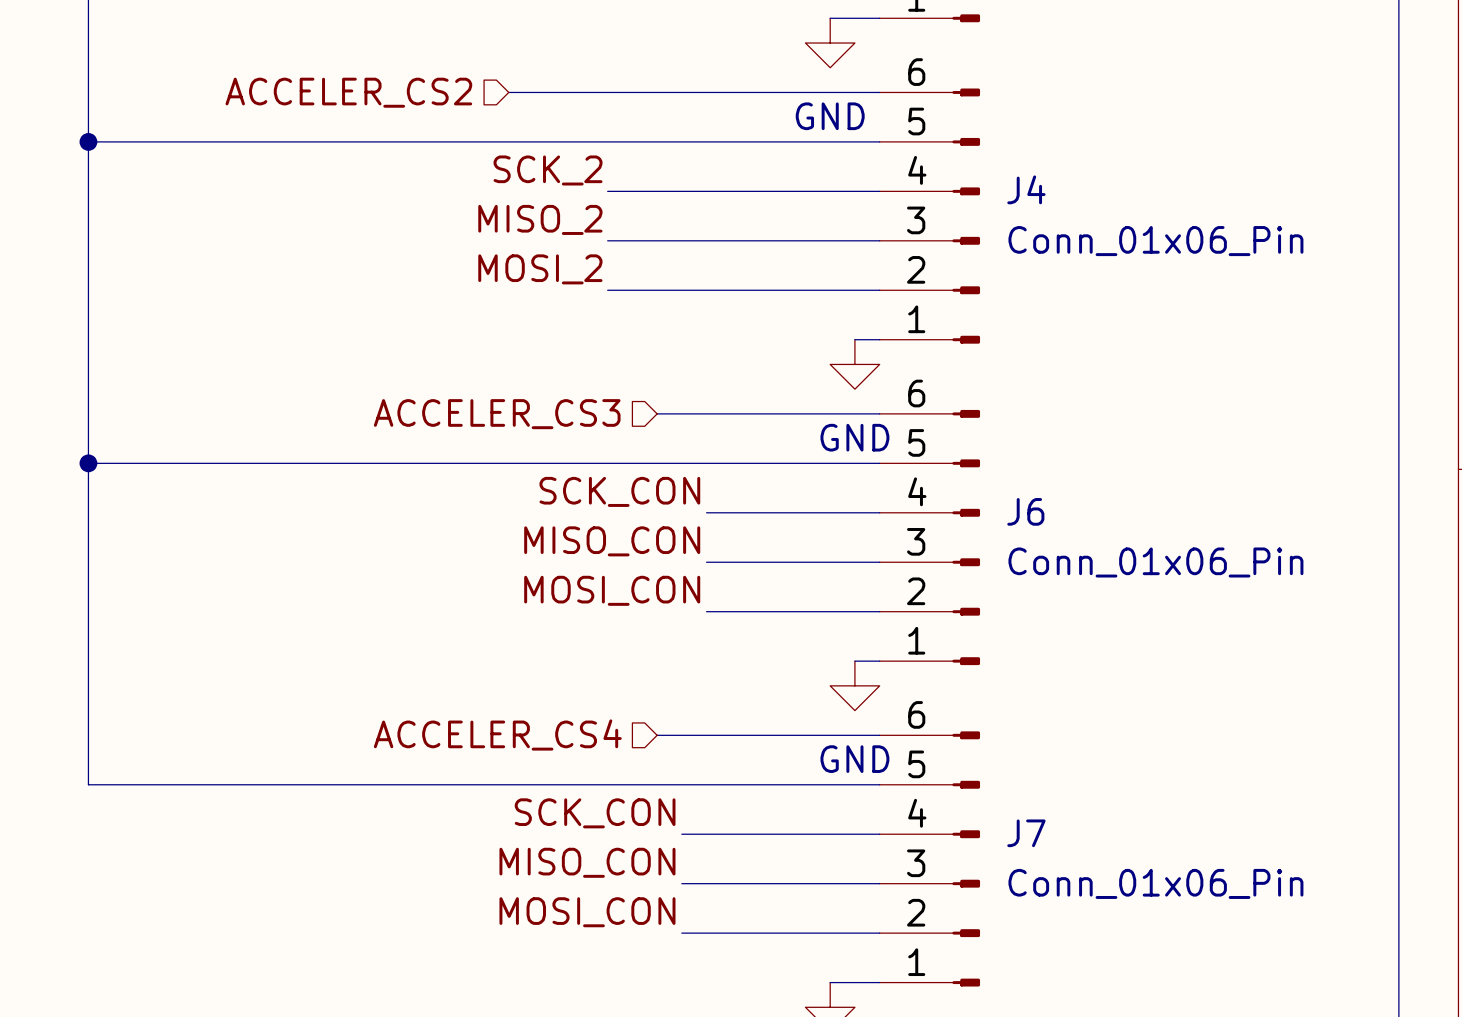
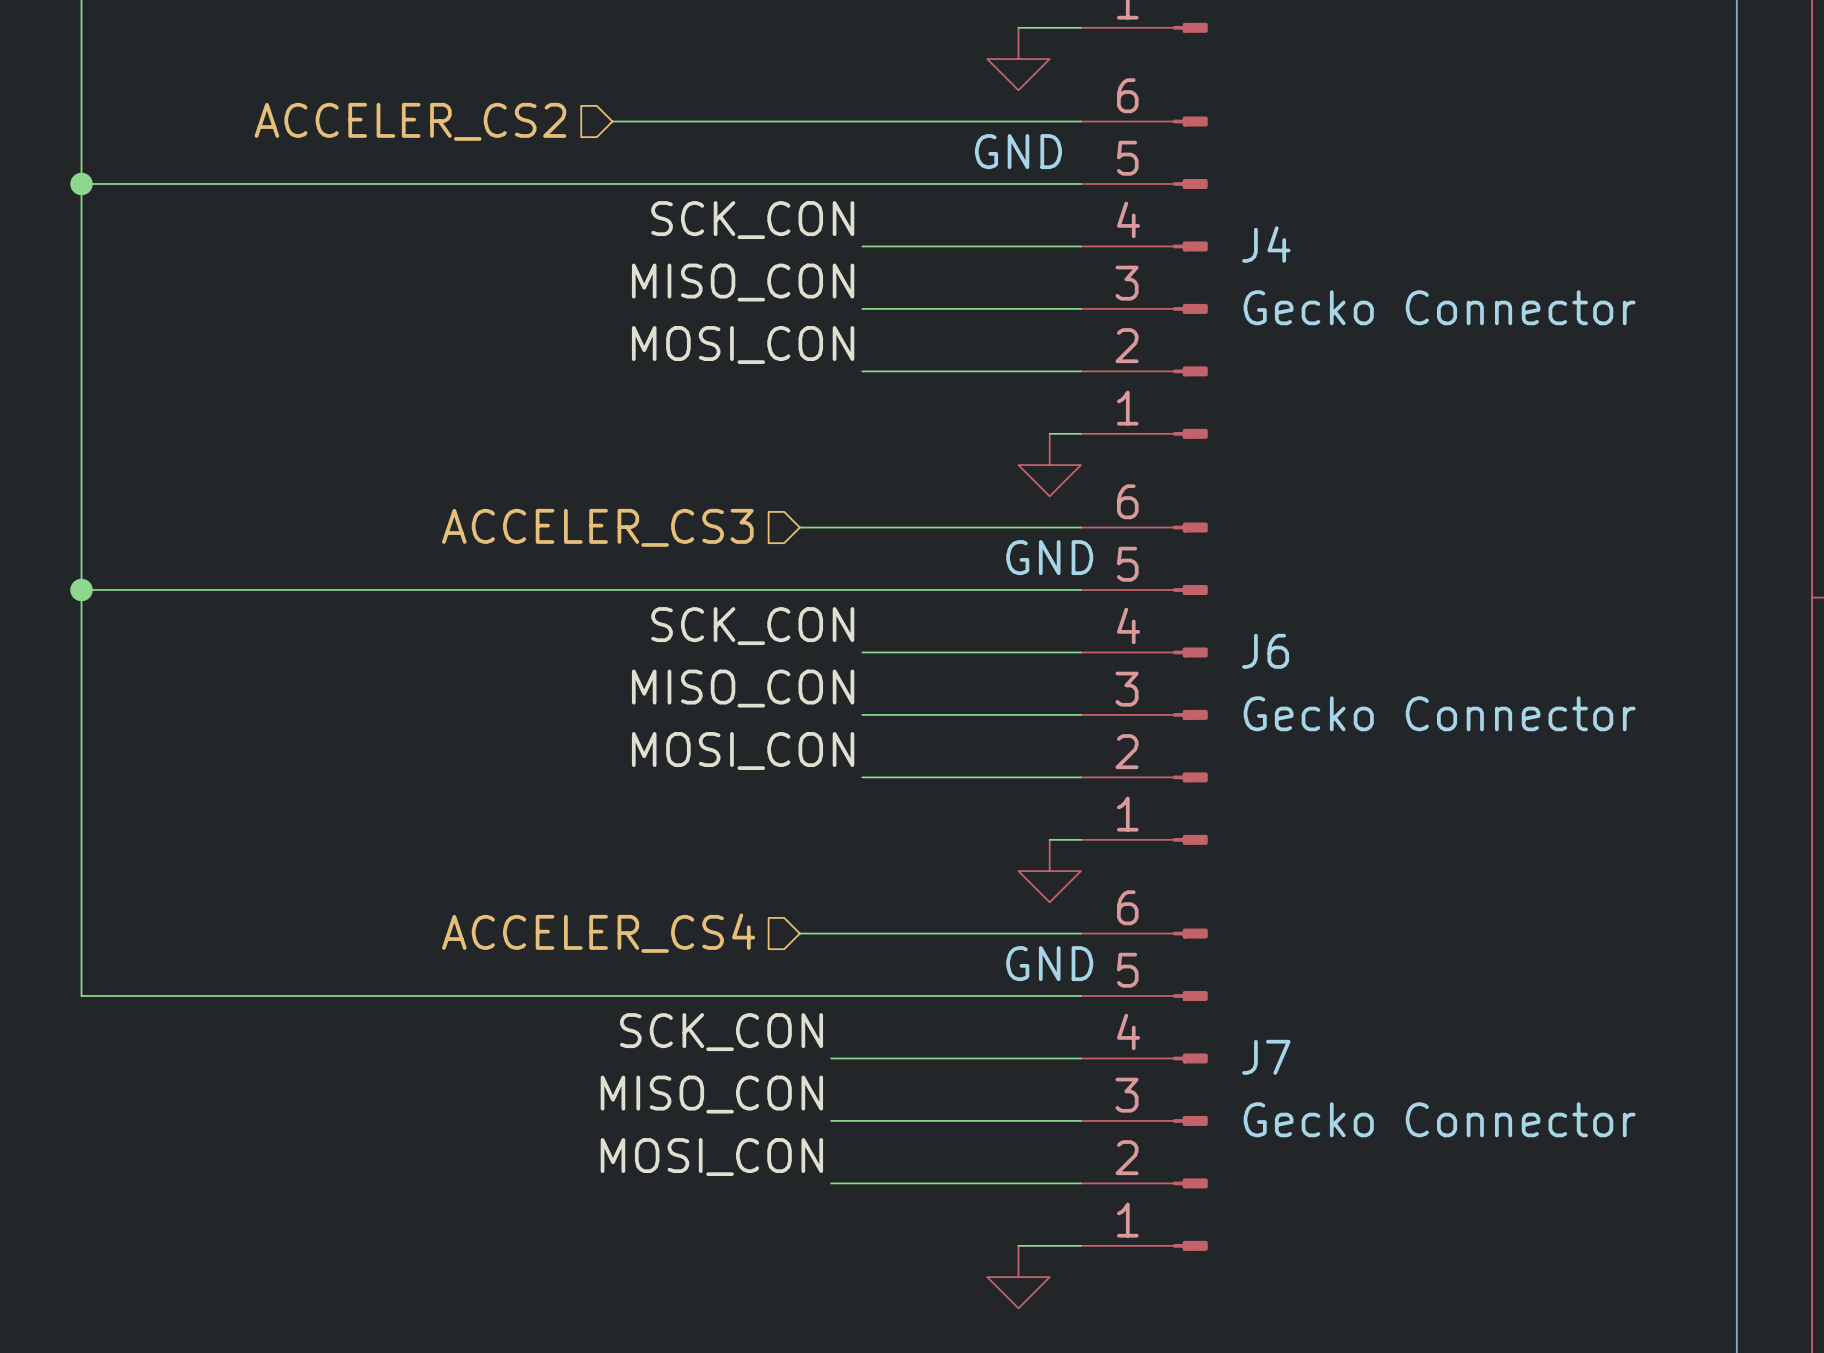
label: SCK_2 (548, 170) -> SCK_CON (752, 220)
wire: (607, 191) (706, 191) -> none
label: MISO_2 (540, 219) -> MISO_CON (743, 282)
wire: (607, 240) (706, 240) -> none
J4 value: Conn_01x06_Pin (1155, 241) -> Gecko Connector (1439, 307)
label: MOSI_2 (540, 269) -> MOSI_CON (743, 344)
wire: (607, 290) (706, 290) -> none
J6 value: Conn_01x06_Pin (1155, 562) -> Gecko Connector (1439, 713)
J7 value: Conn_01x06_Pin (1155, 883) -> Gecko Connector (1439, 1119)

